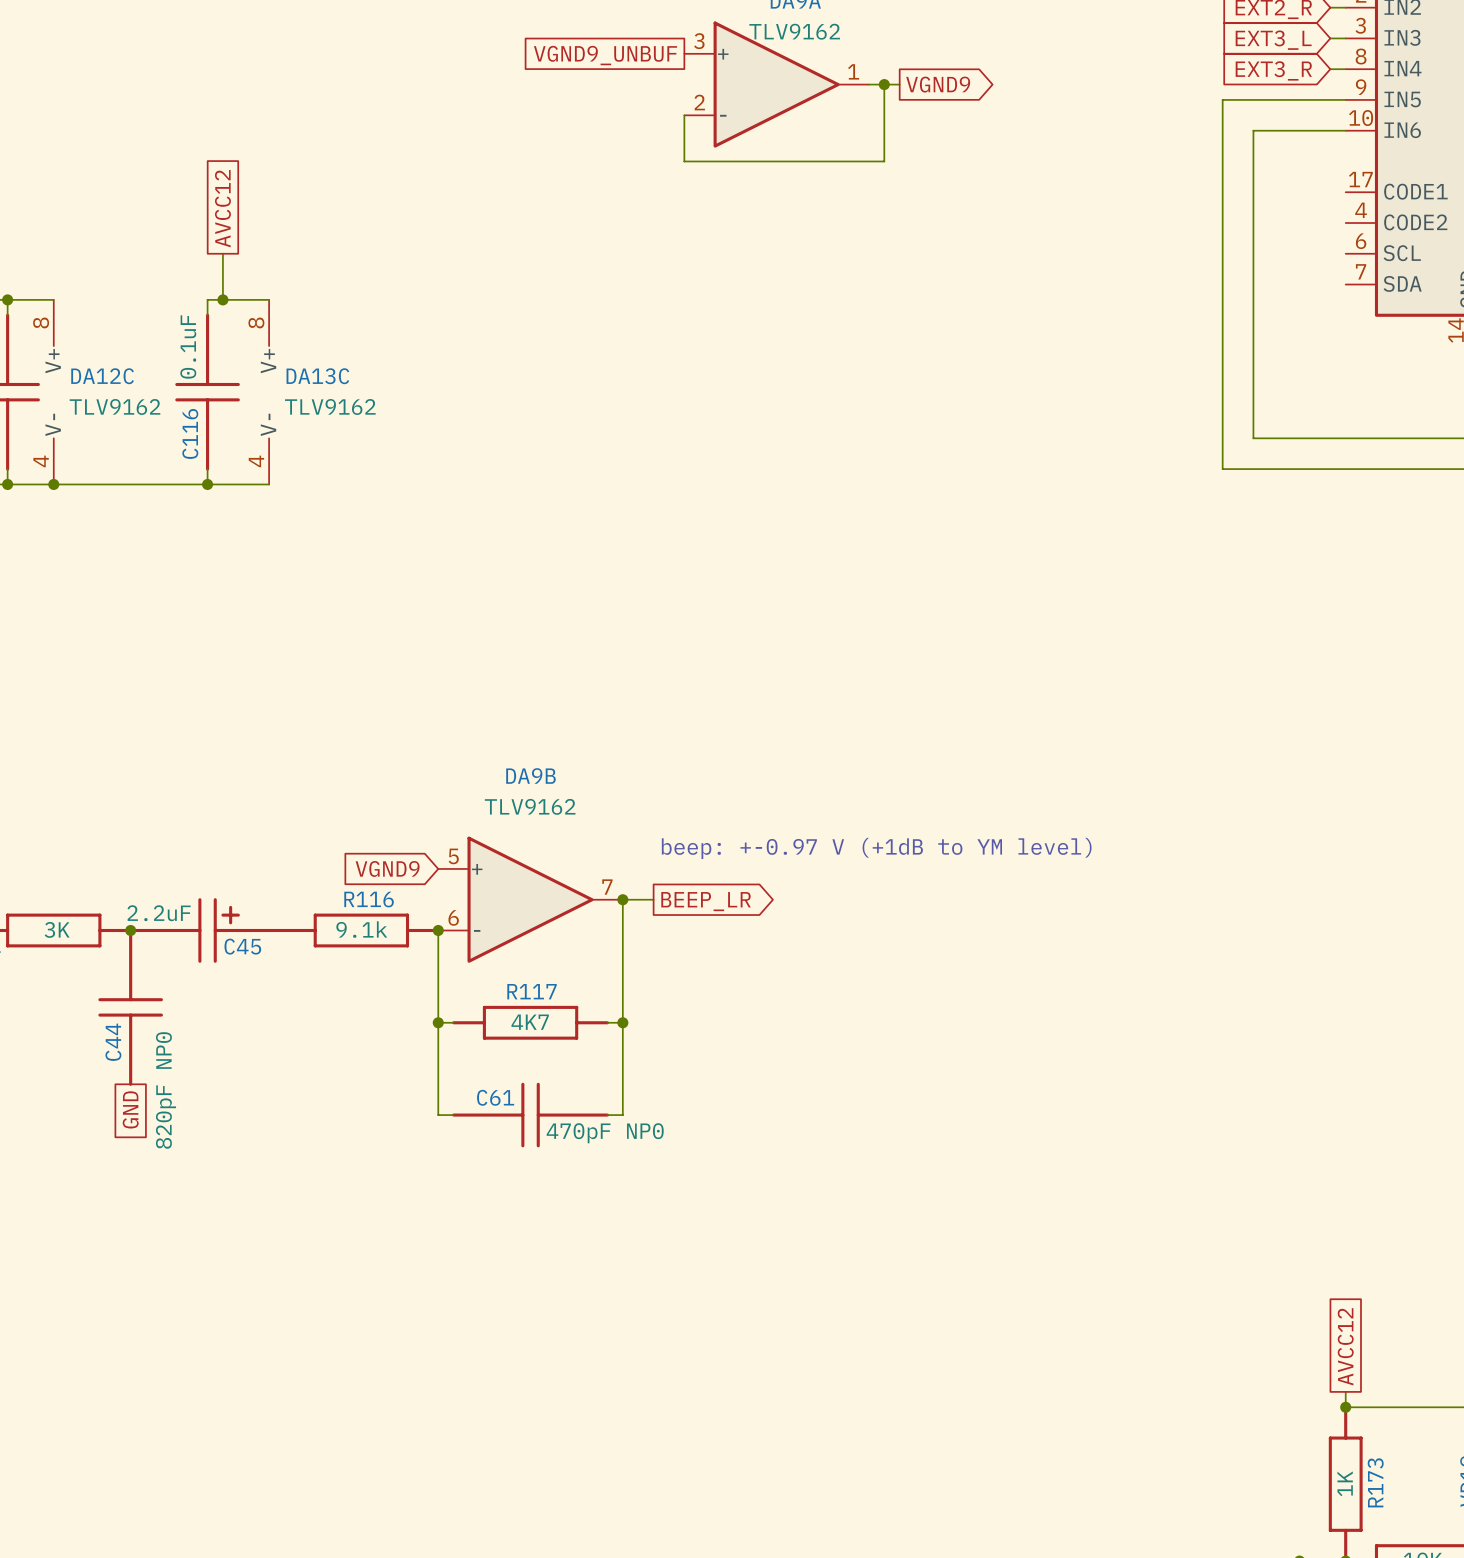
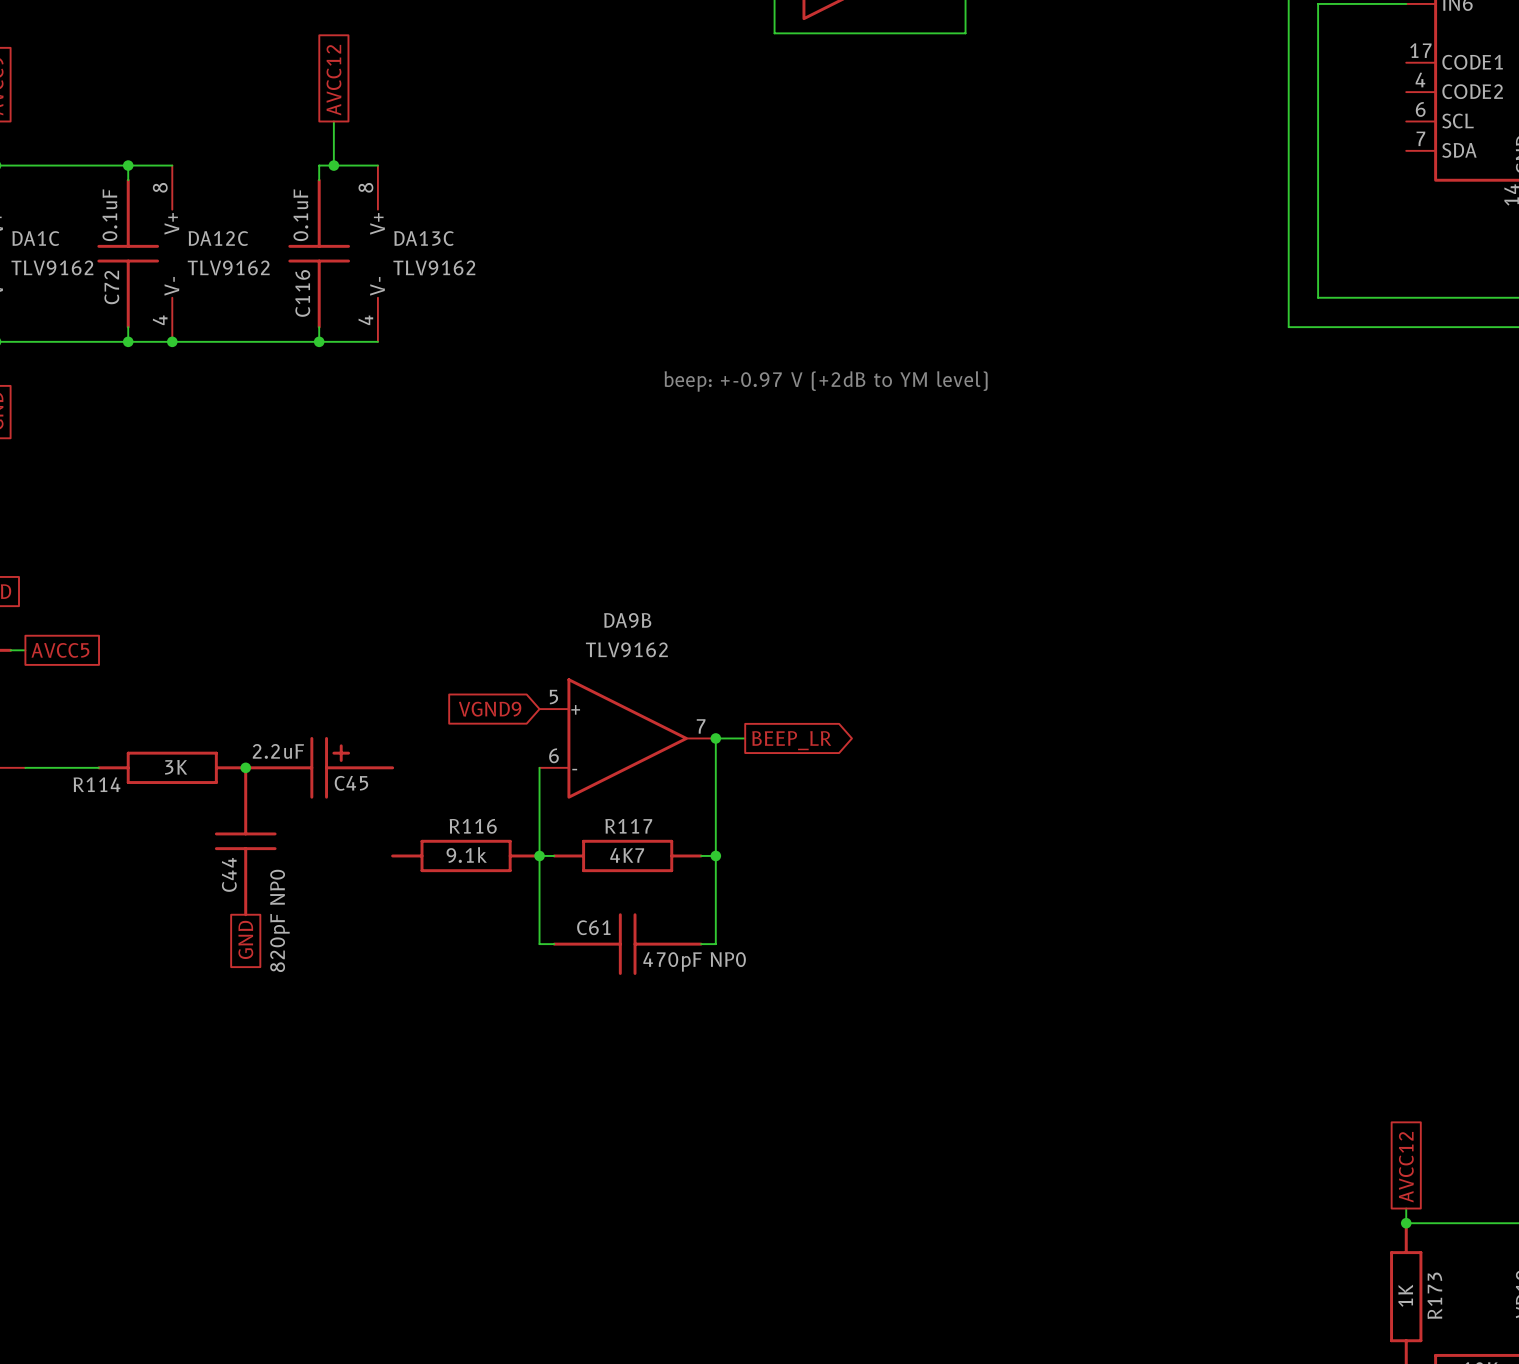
text: none -> beep: +-0.97 V (+2dB to YM level) (826, 381)
text: beep: +-0.97 V (+1dB to YM level) (876, 848) -> none
R116 position: (361, 930) -> (466, 855)
junction: (438, 930) -> none

